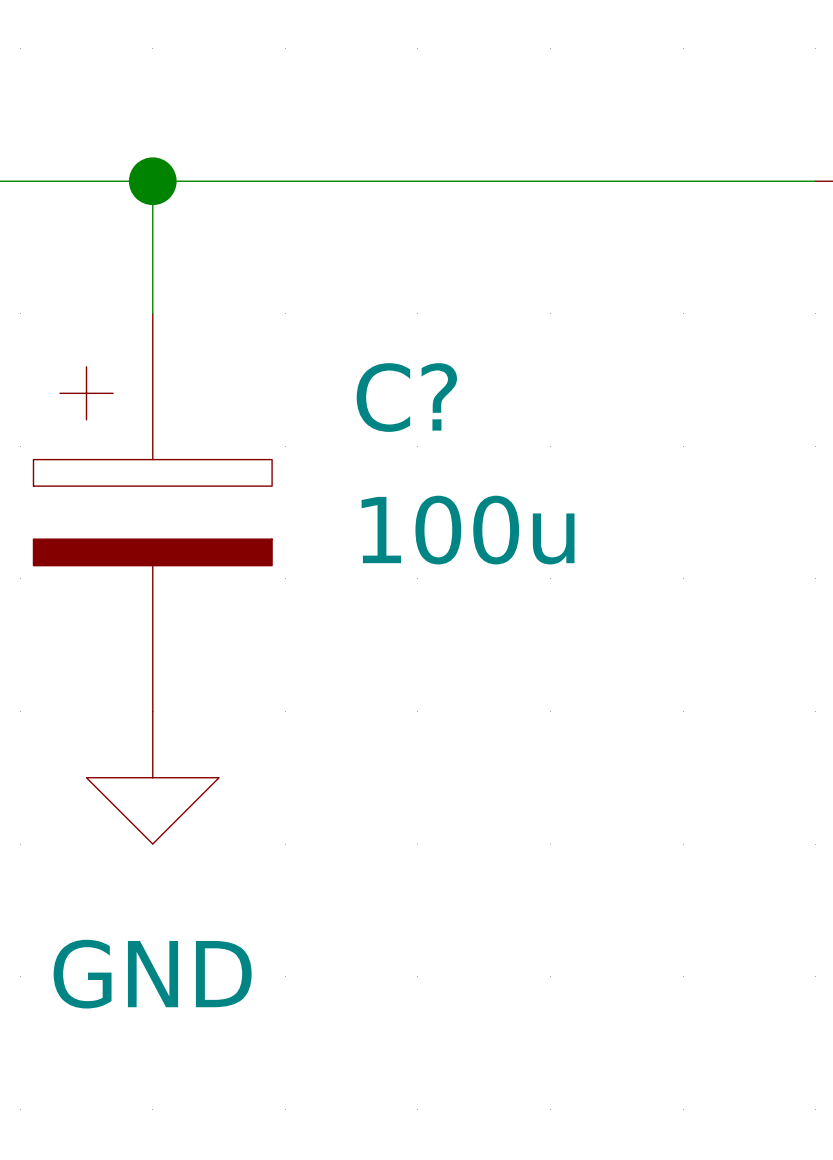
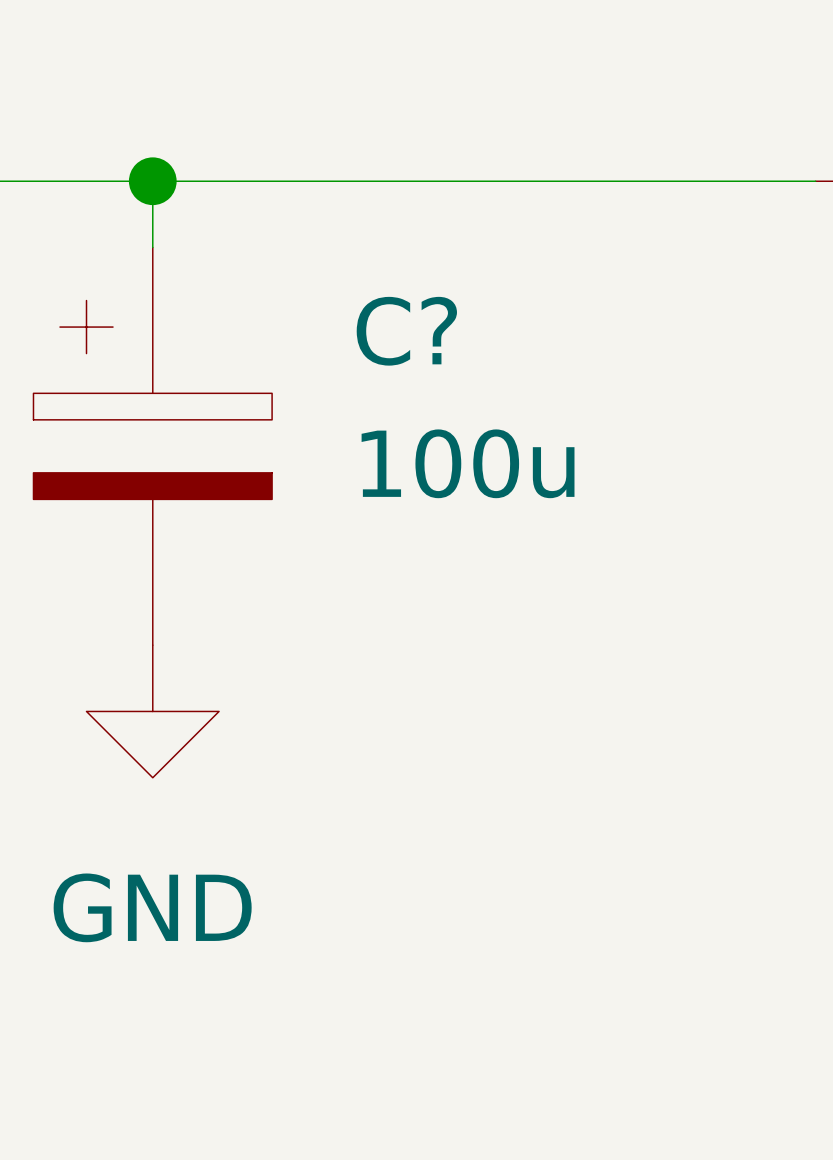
C? position: (152, 512) -> (152, 446)
power symbol position: GND (152, 777) -> GND (152, 711)

